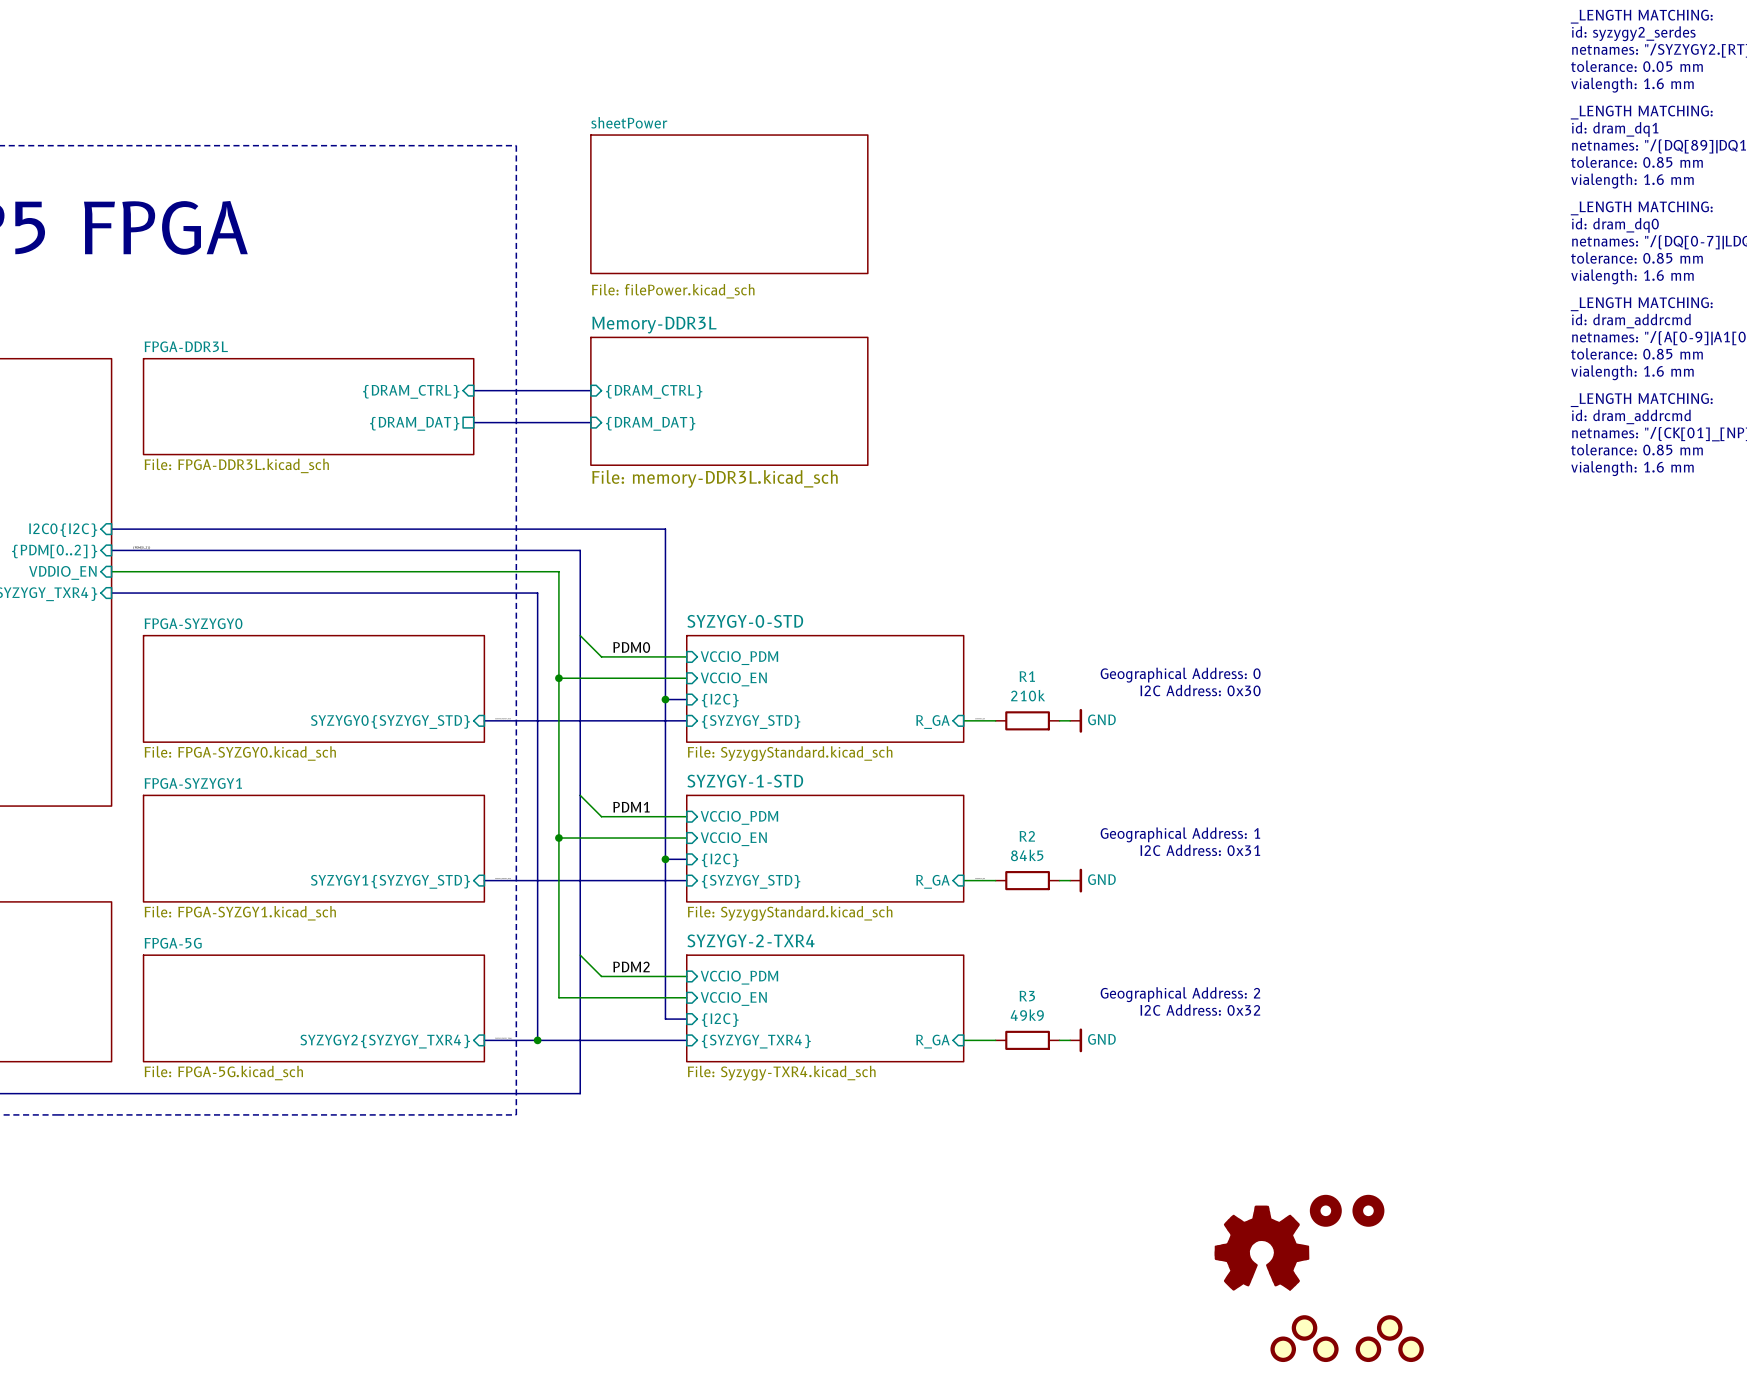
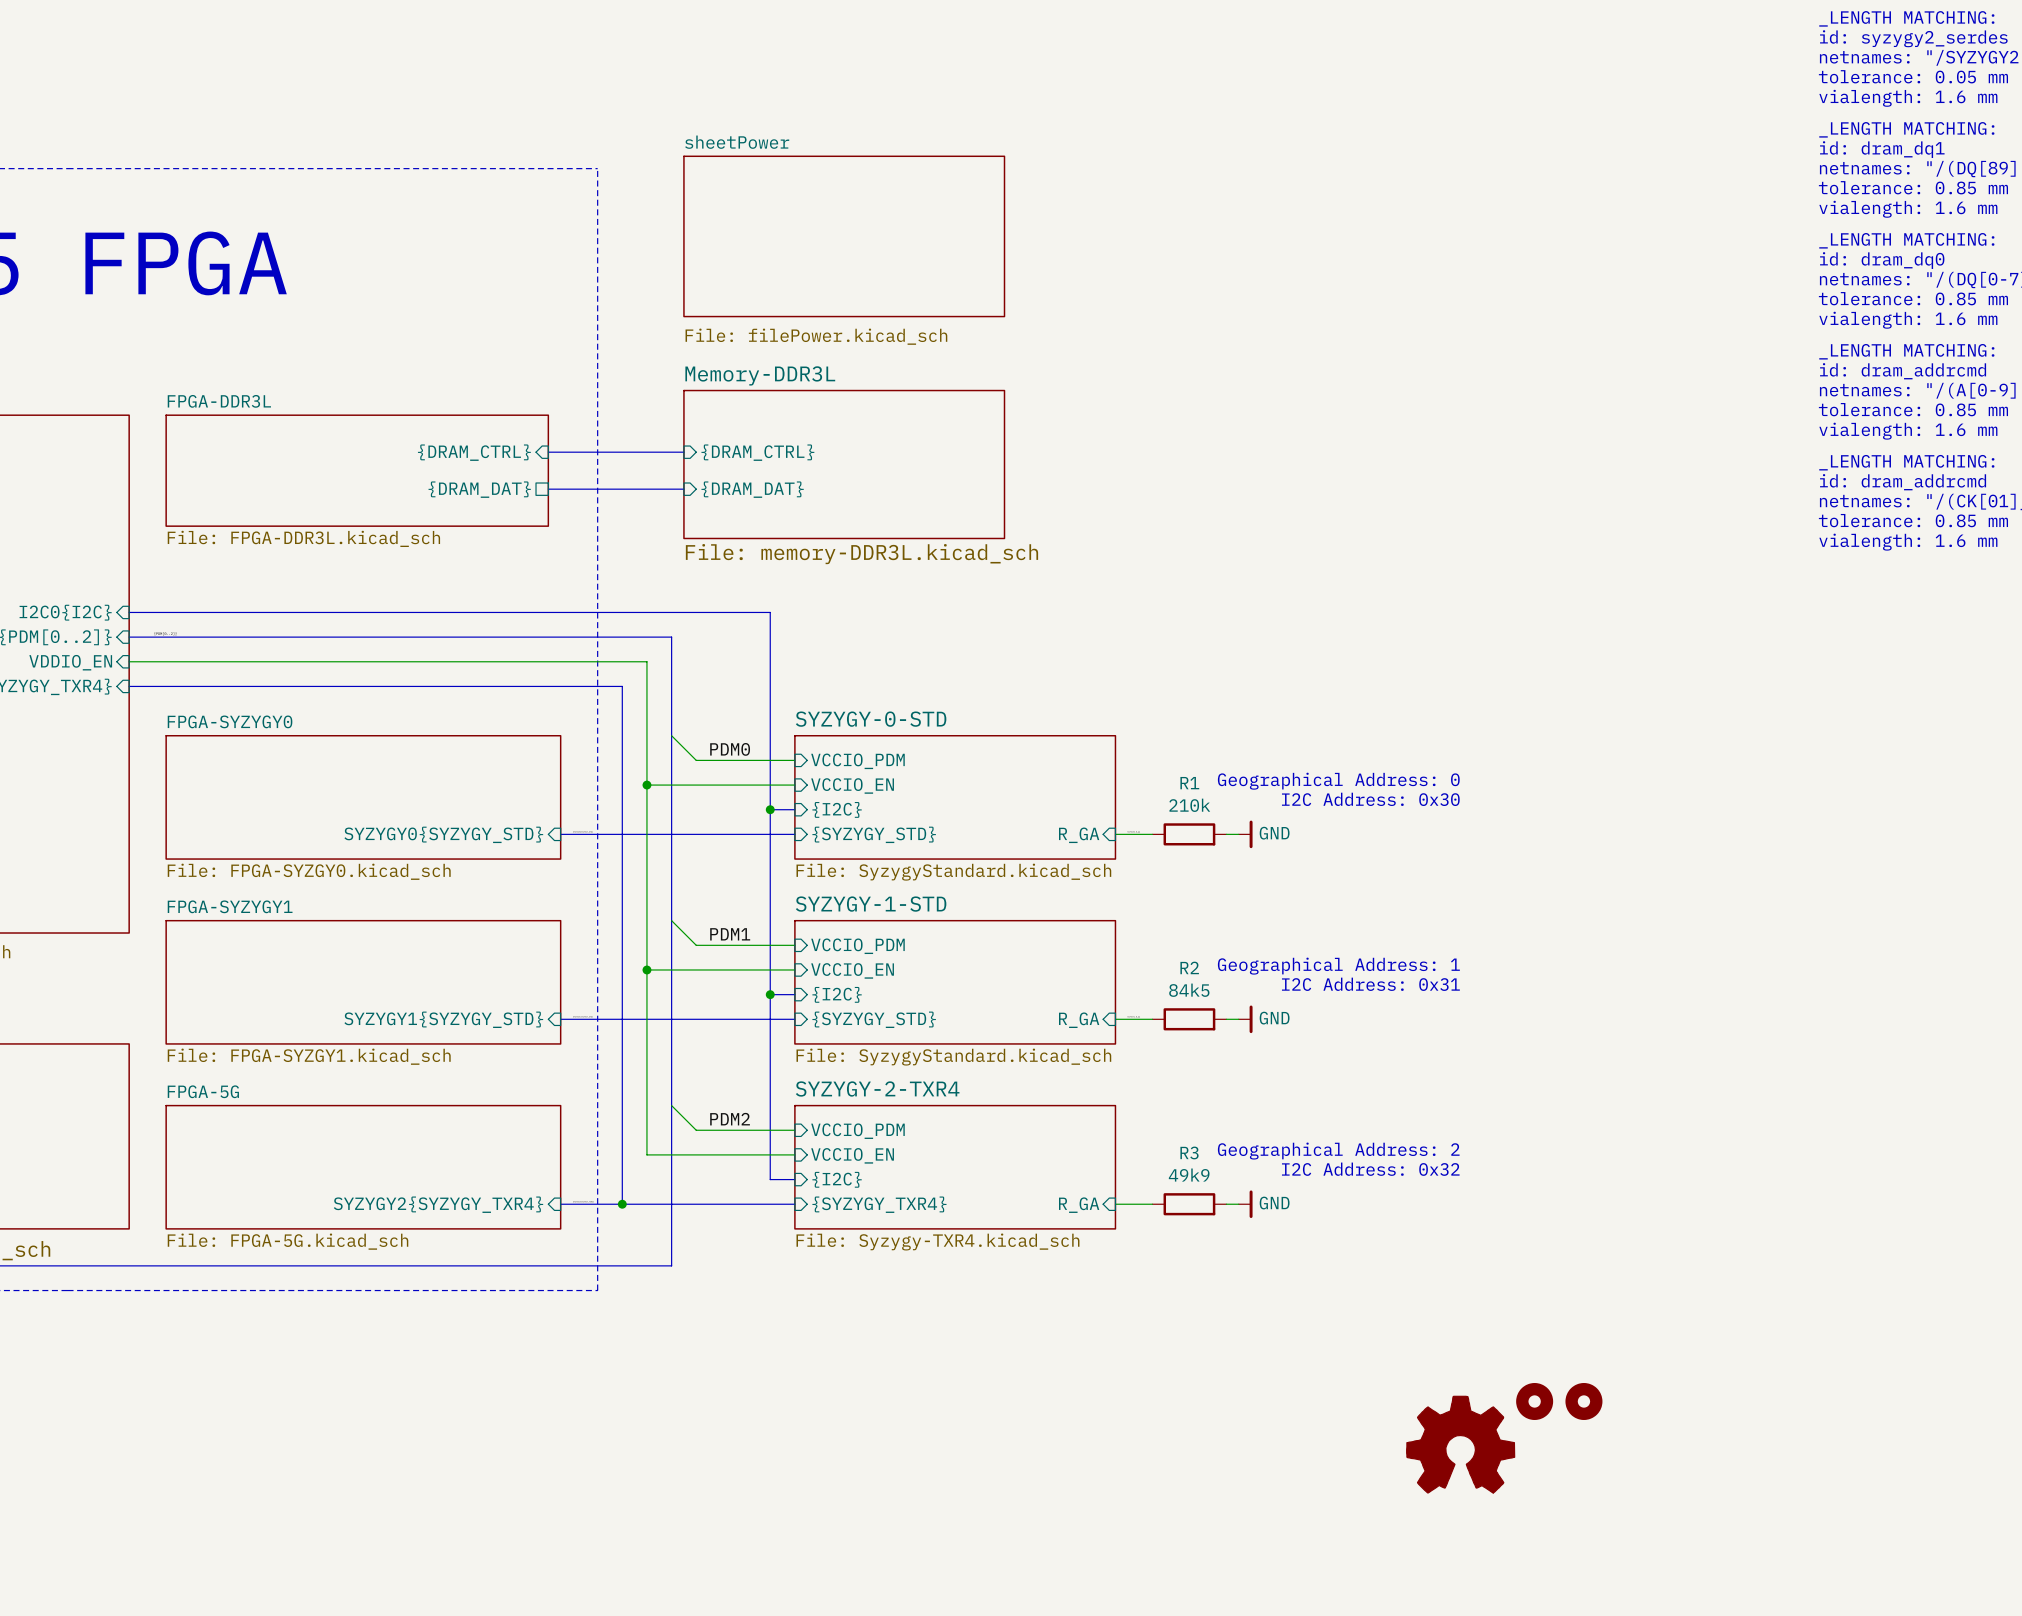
part: (1304, 1327) -> none
part: (1389, 1327) -> none
part: (1283, 1349) -> none
part: (1325, 1349) -> none
part: (1368, 1349) -> none
part: (1411, 1349) -> none

